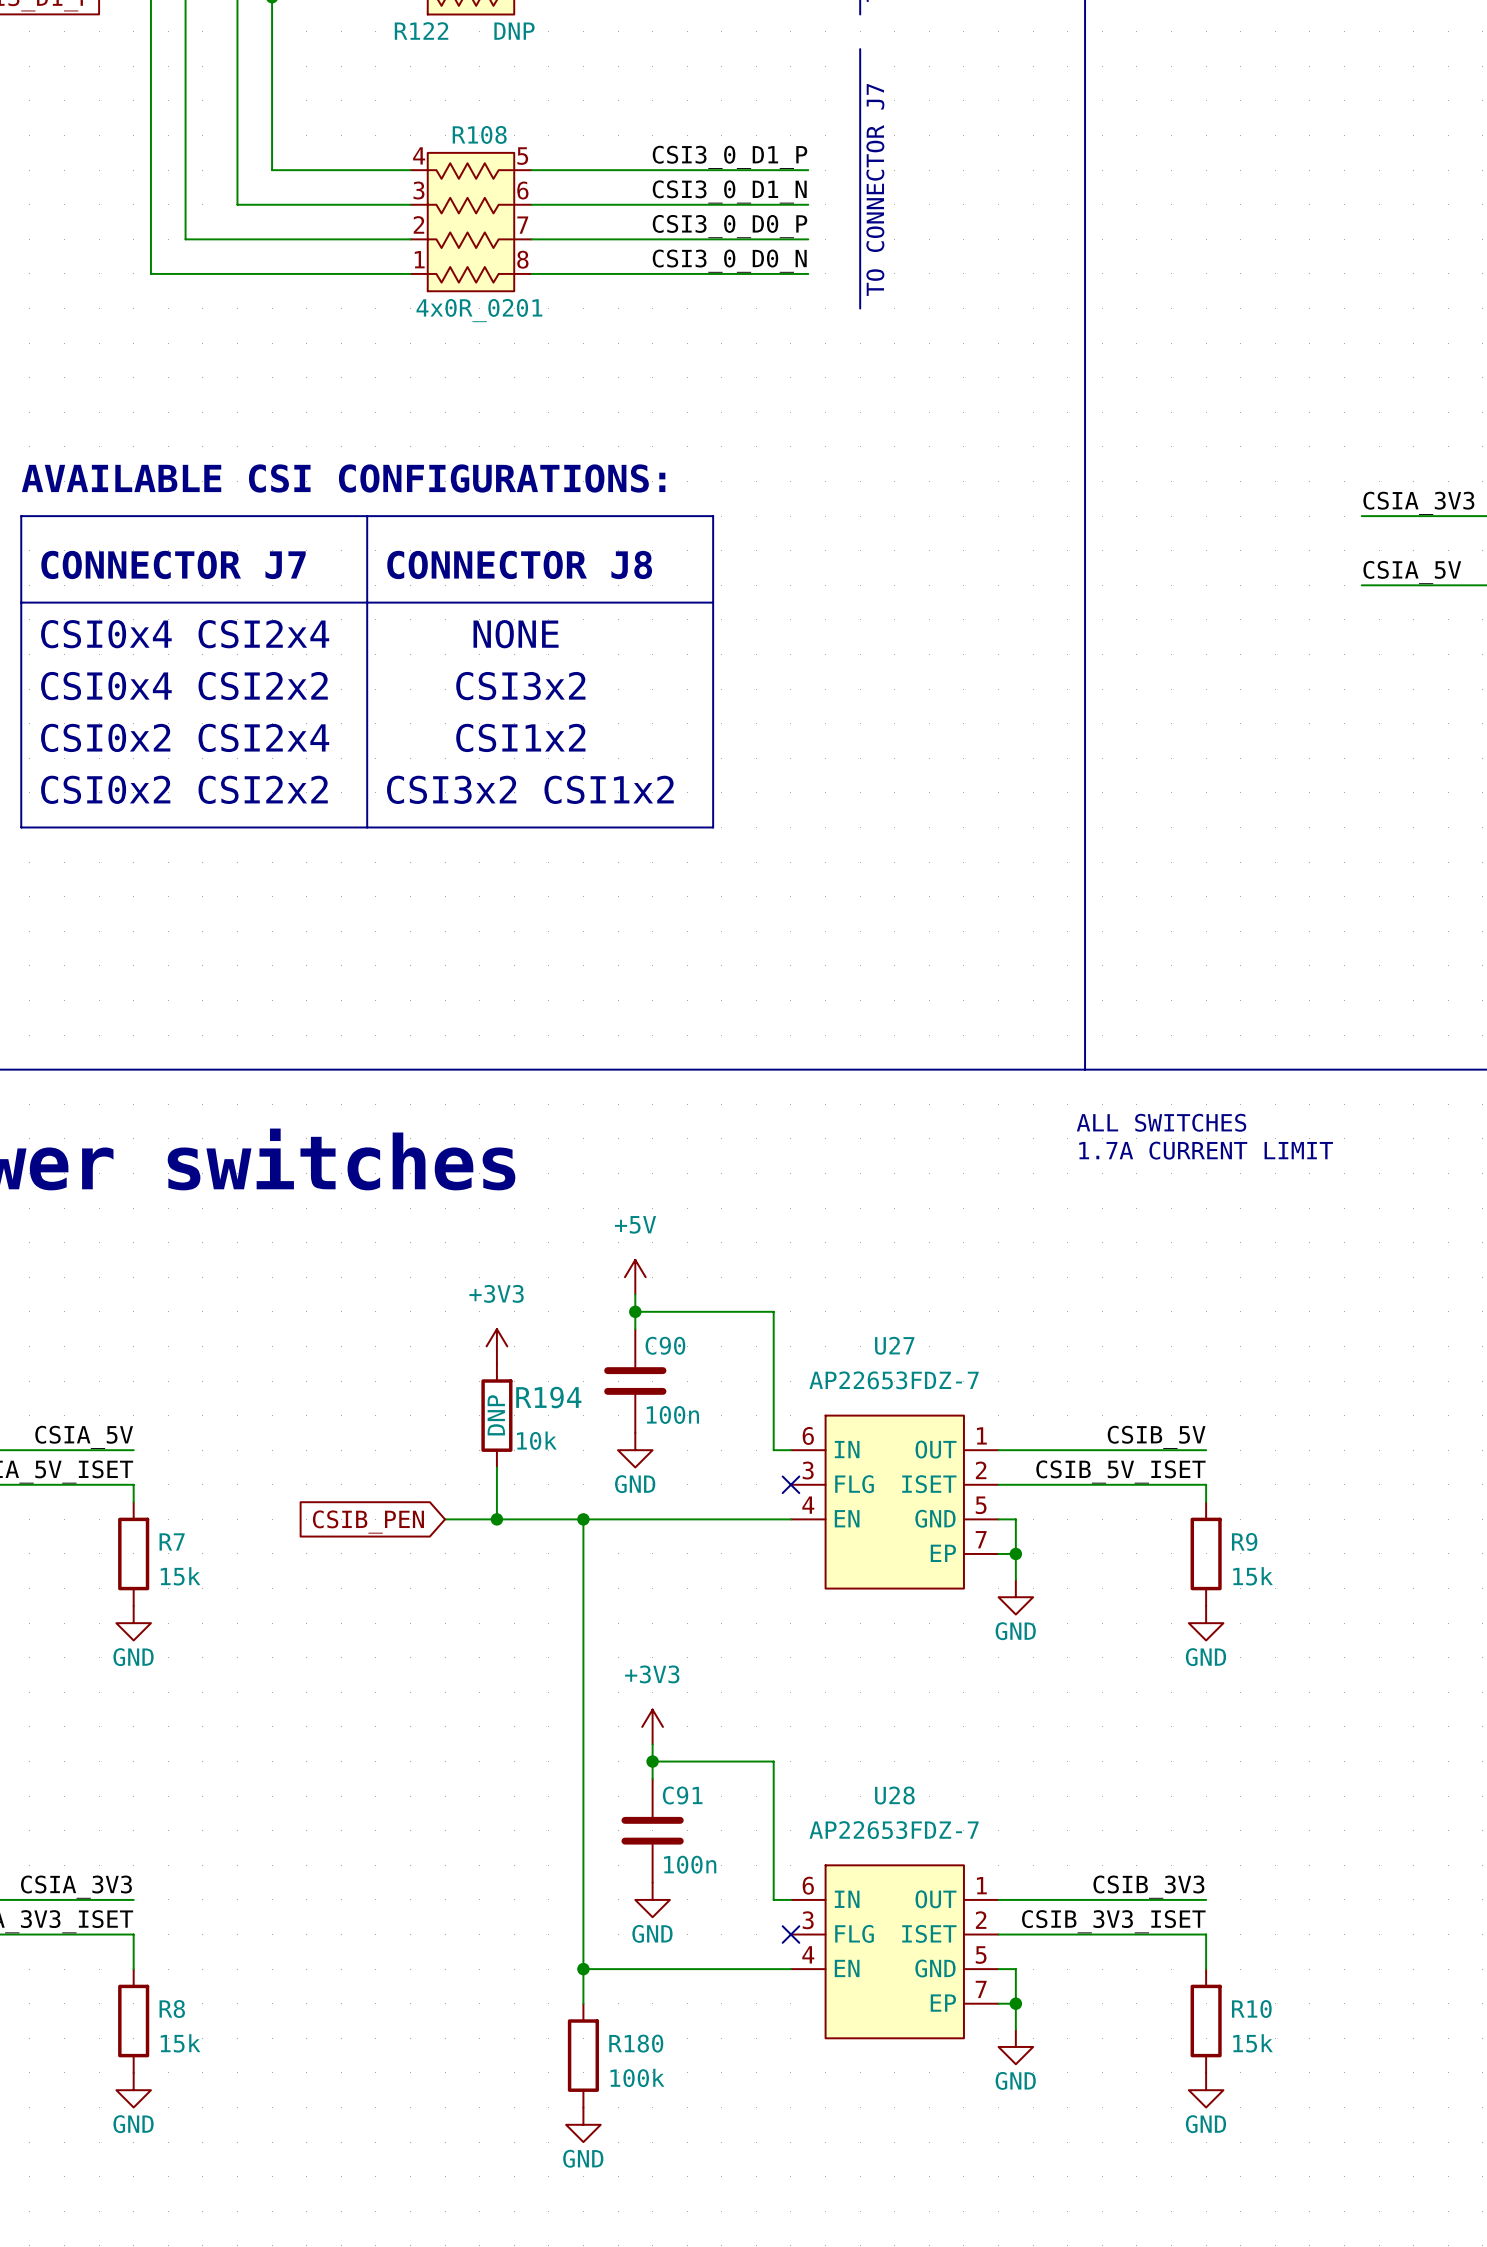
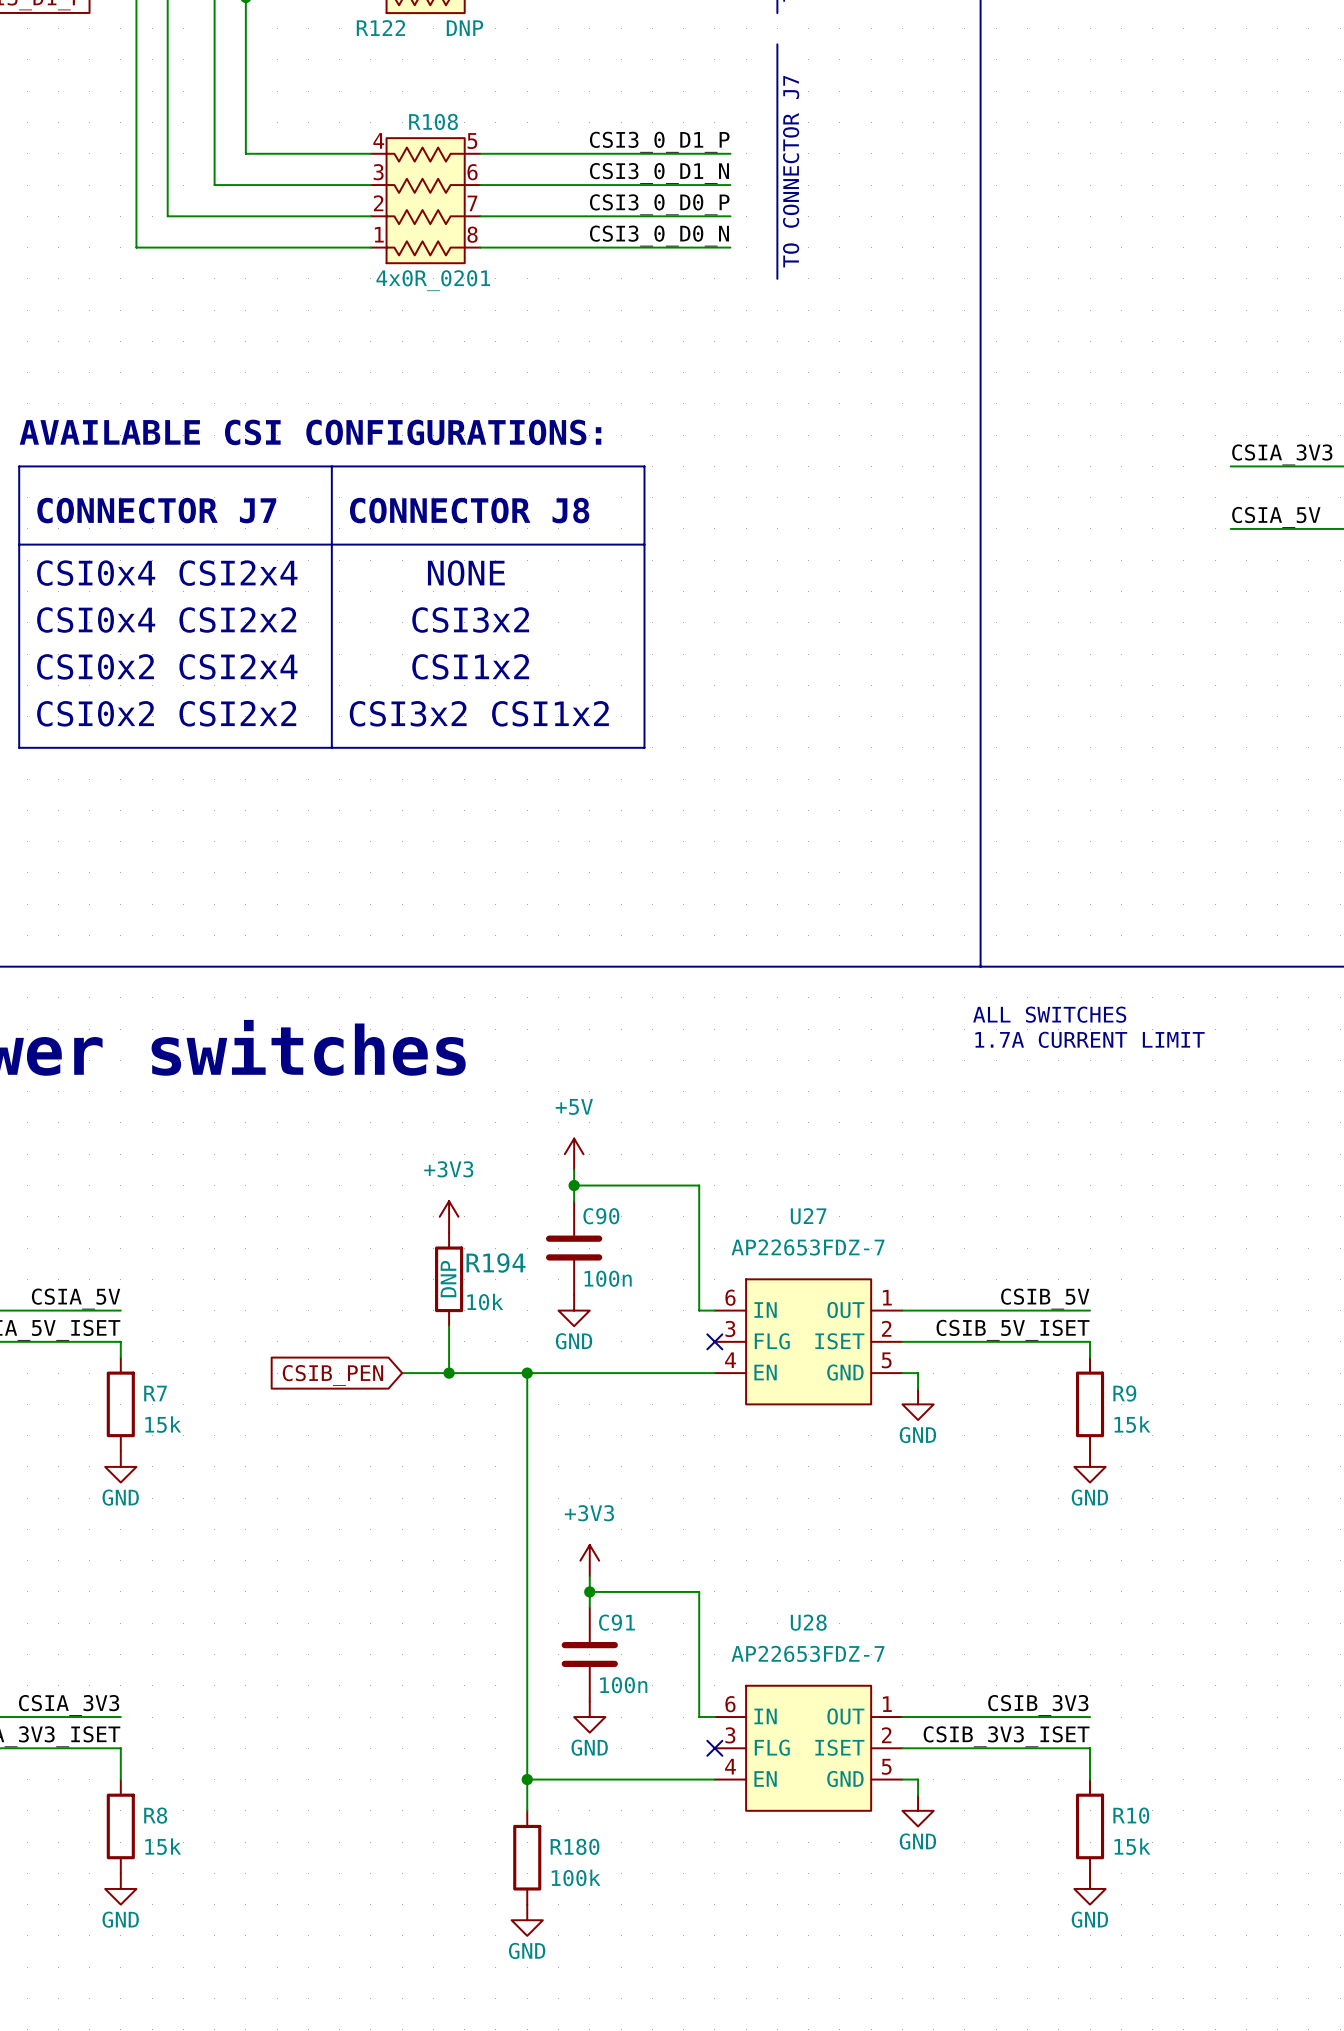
U27 symbol: [790, 1415, 999, 1589] -> [714, 1279, 903, 1405]
wire: (1015, 1536) (1015, 1579) -> none
junction: (1015, 1553) -> none
power symbol position: GND (1015, 1597) -> GND (918, 1404)
U28 symbol: [790, 1865, 999, 2039] -> [714, 1685, 903, 1811]
wire: (1015, 1986) (1015, 2029) -> none
junction: (1015, 2003) -> none
power symbol position: GND (1015, 2046) -> GND (918, 1810)

